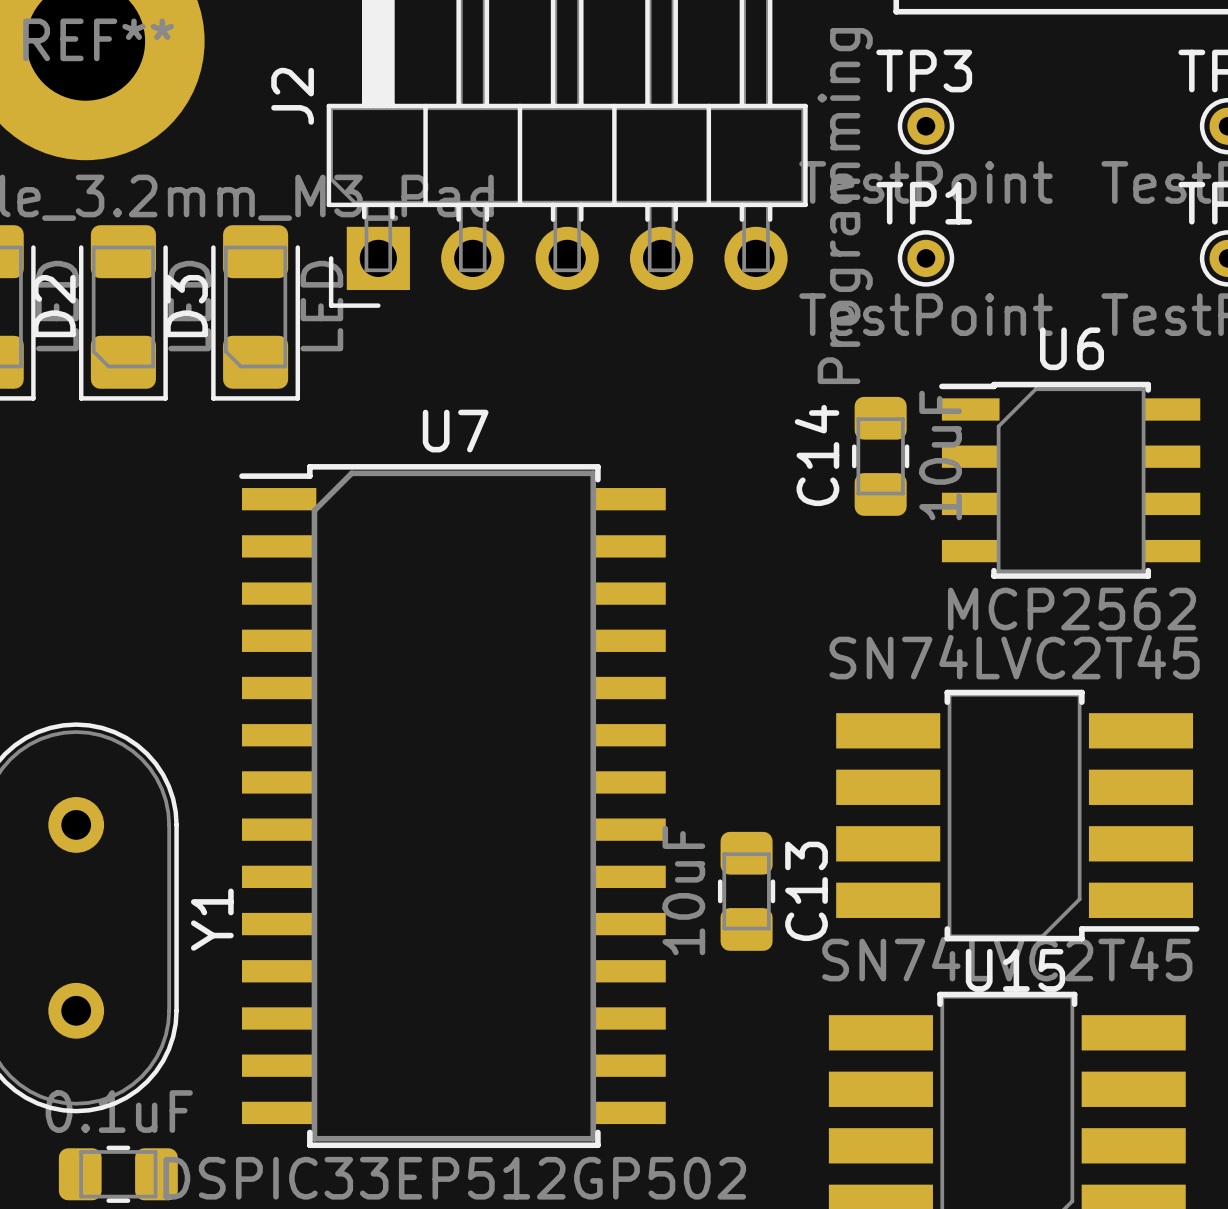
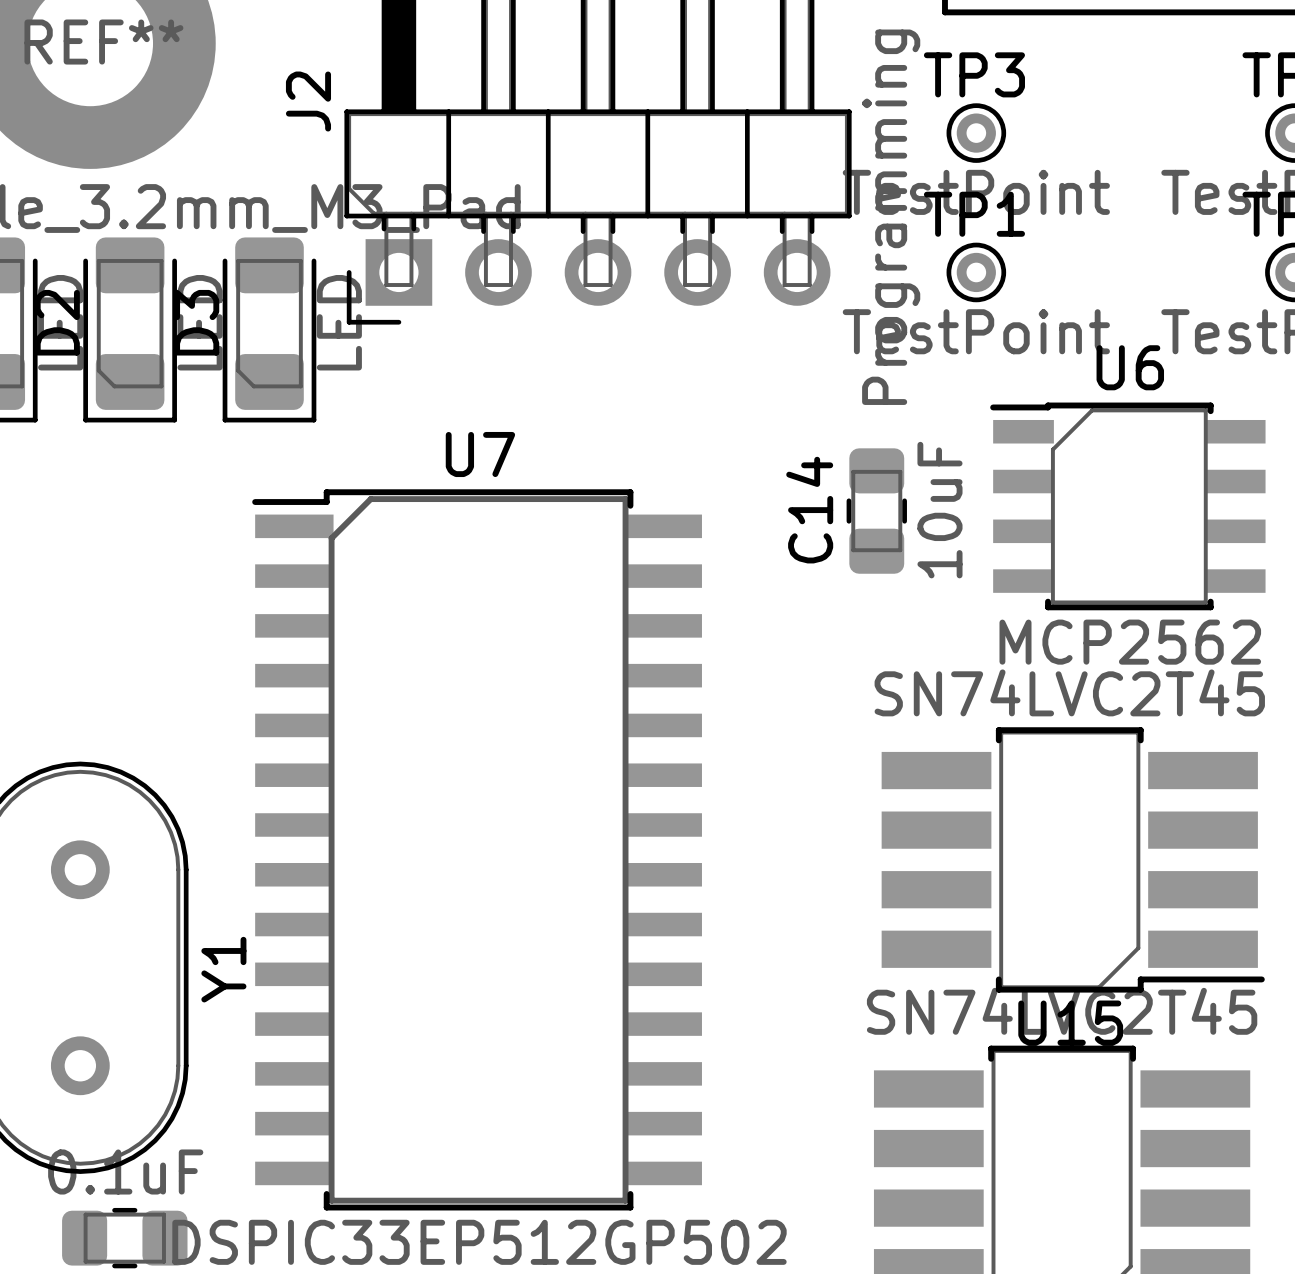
C14 position: (880, 456) -> (876, 511)
C13: 10uF (746, 891) -> none

